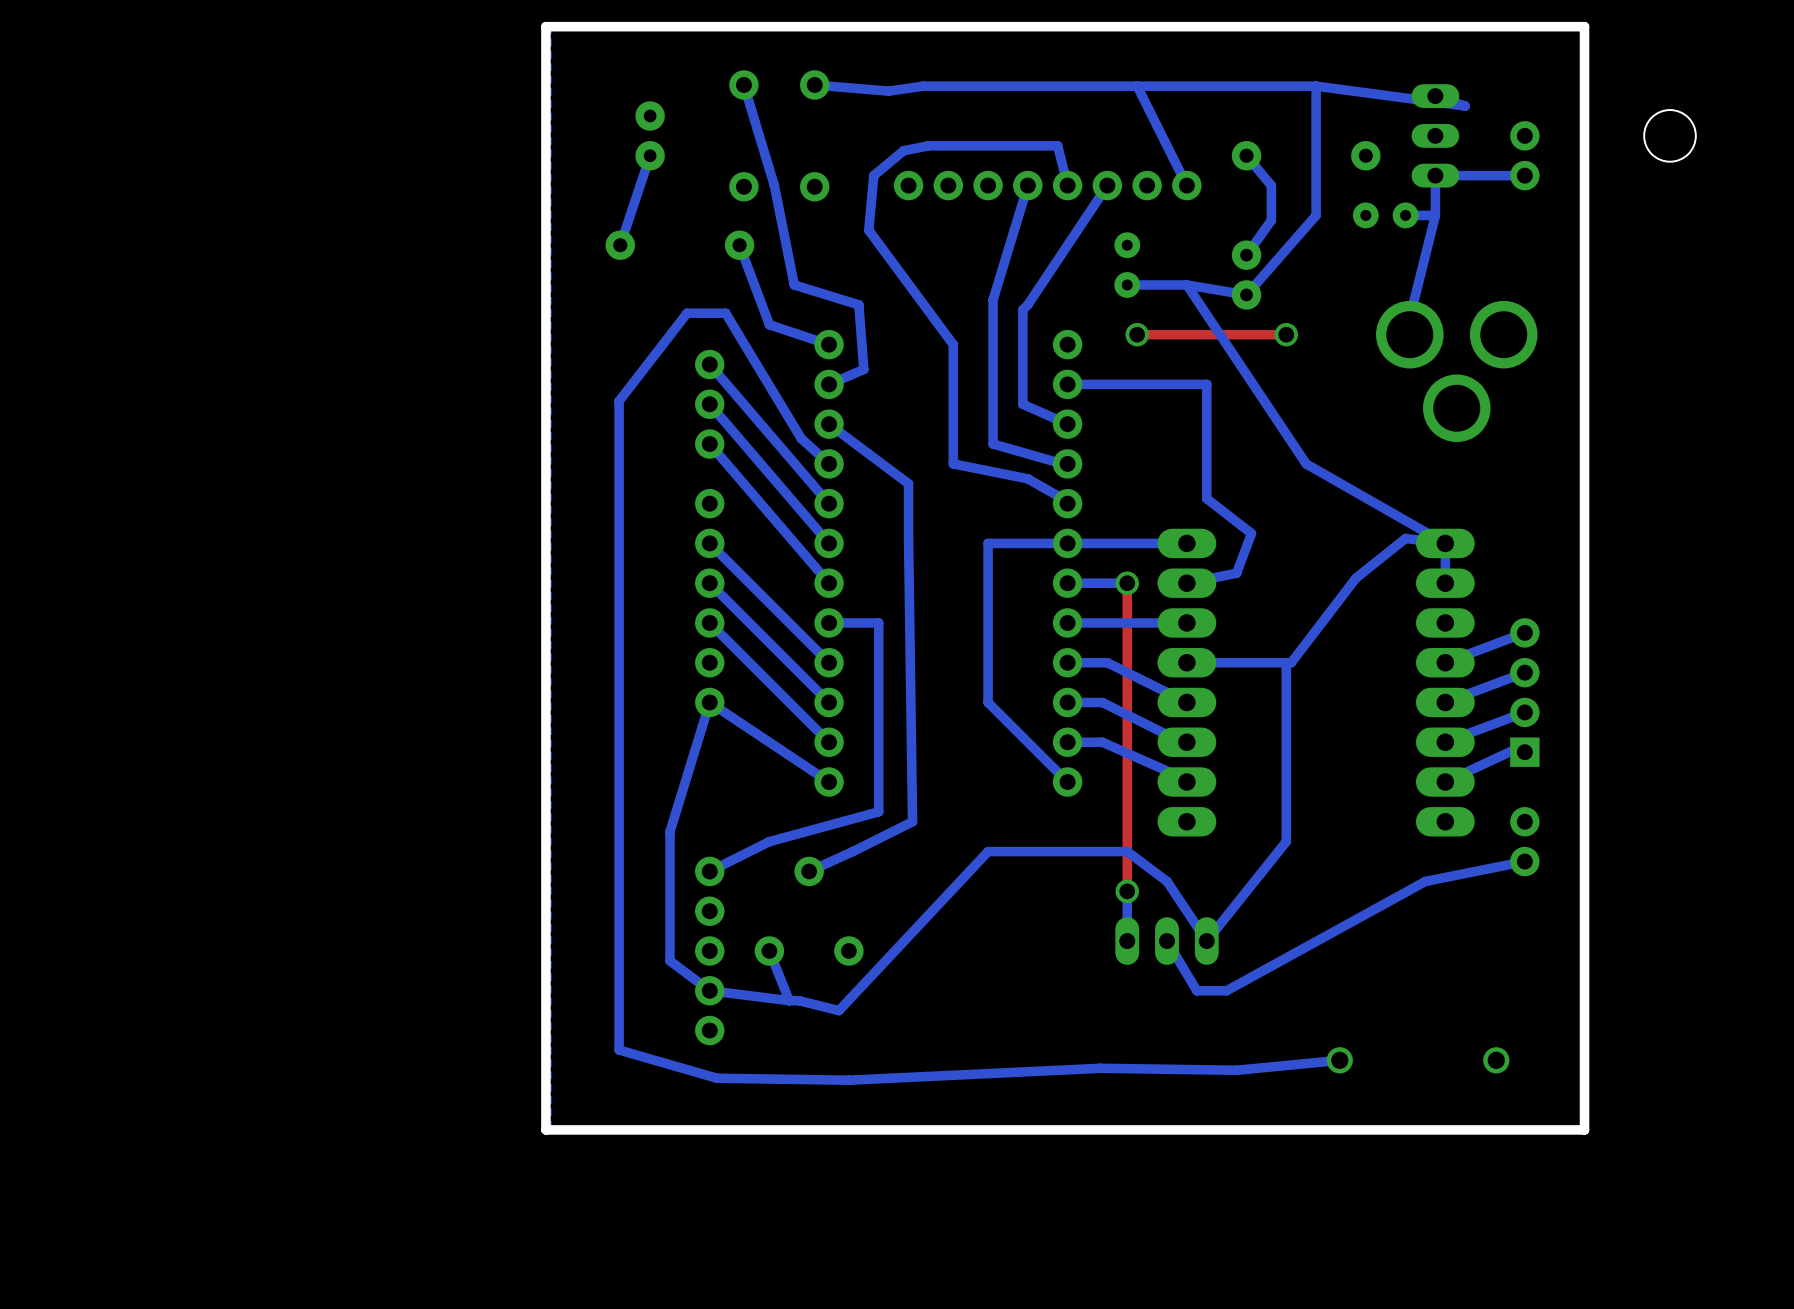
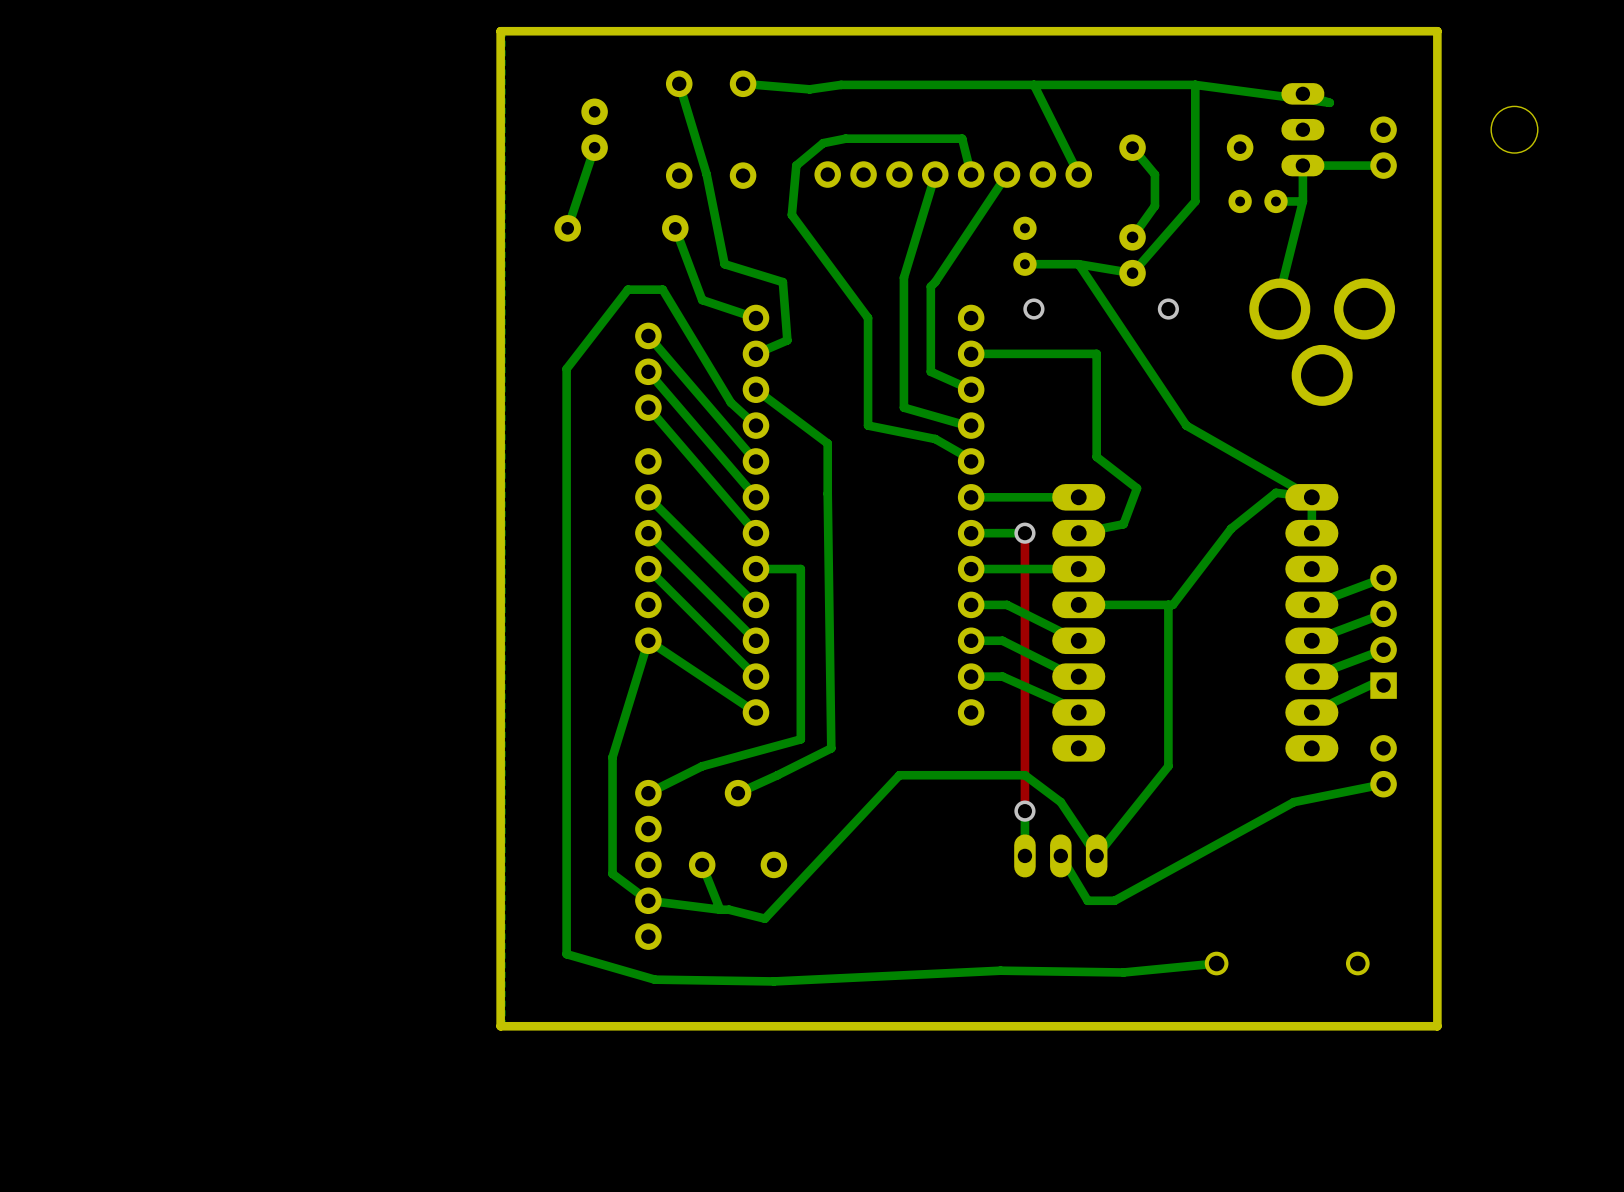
top track: (1286, 334) (1137, 334) -> none
bottom track: (1067, 543) (988, 543) (988, 702) (1067, 782) -> none

